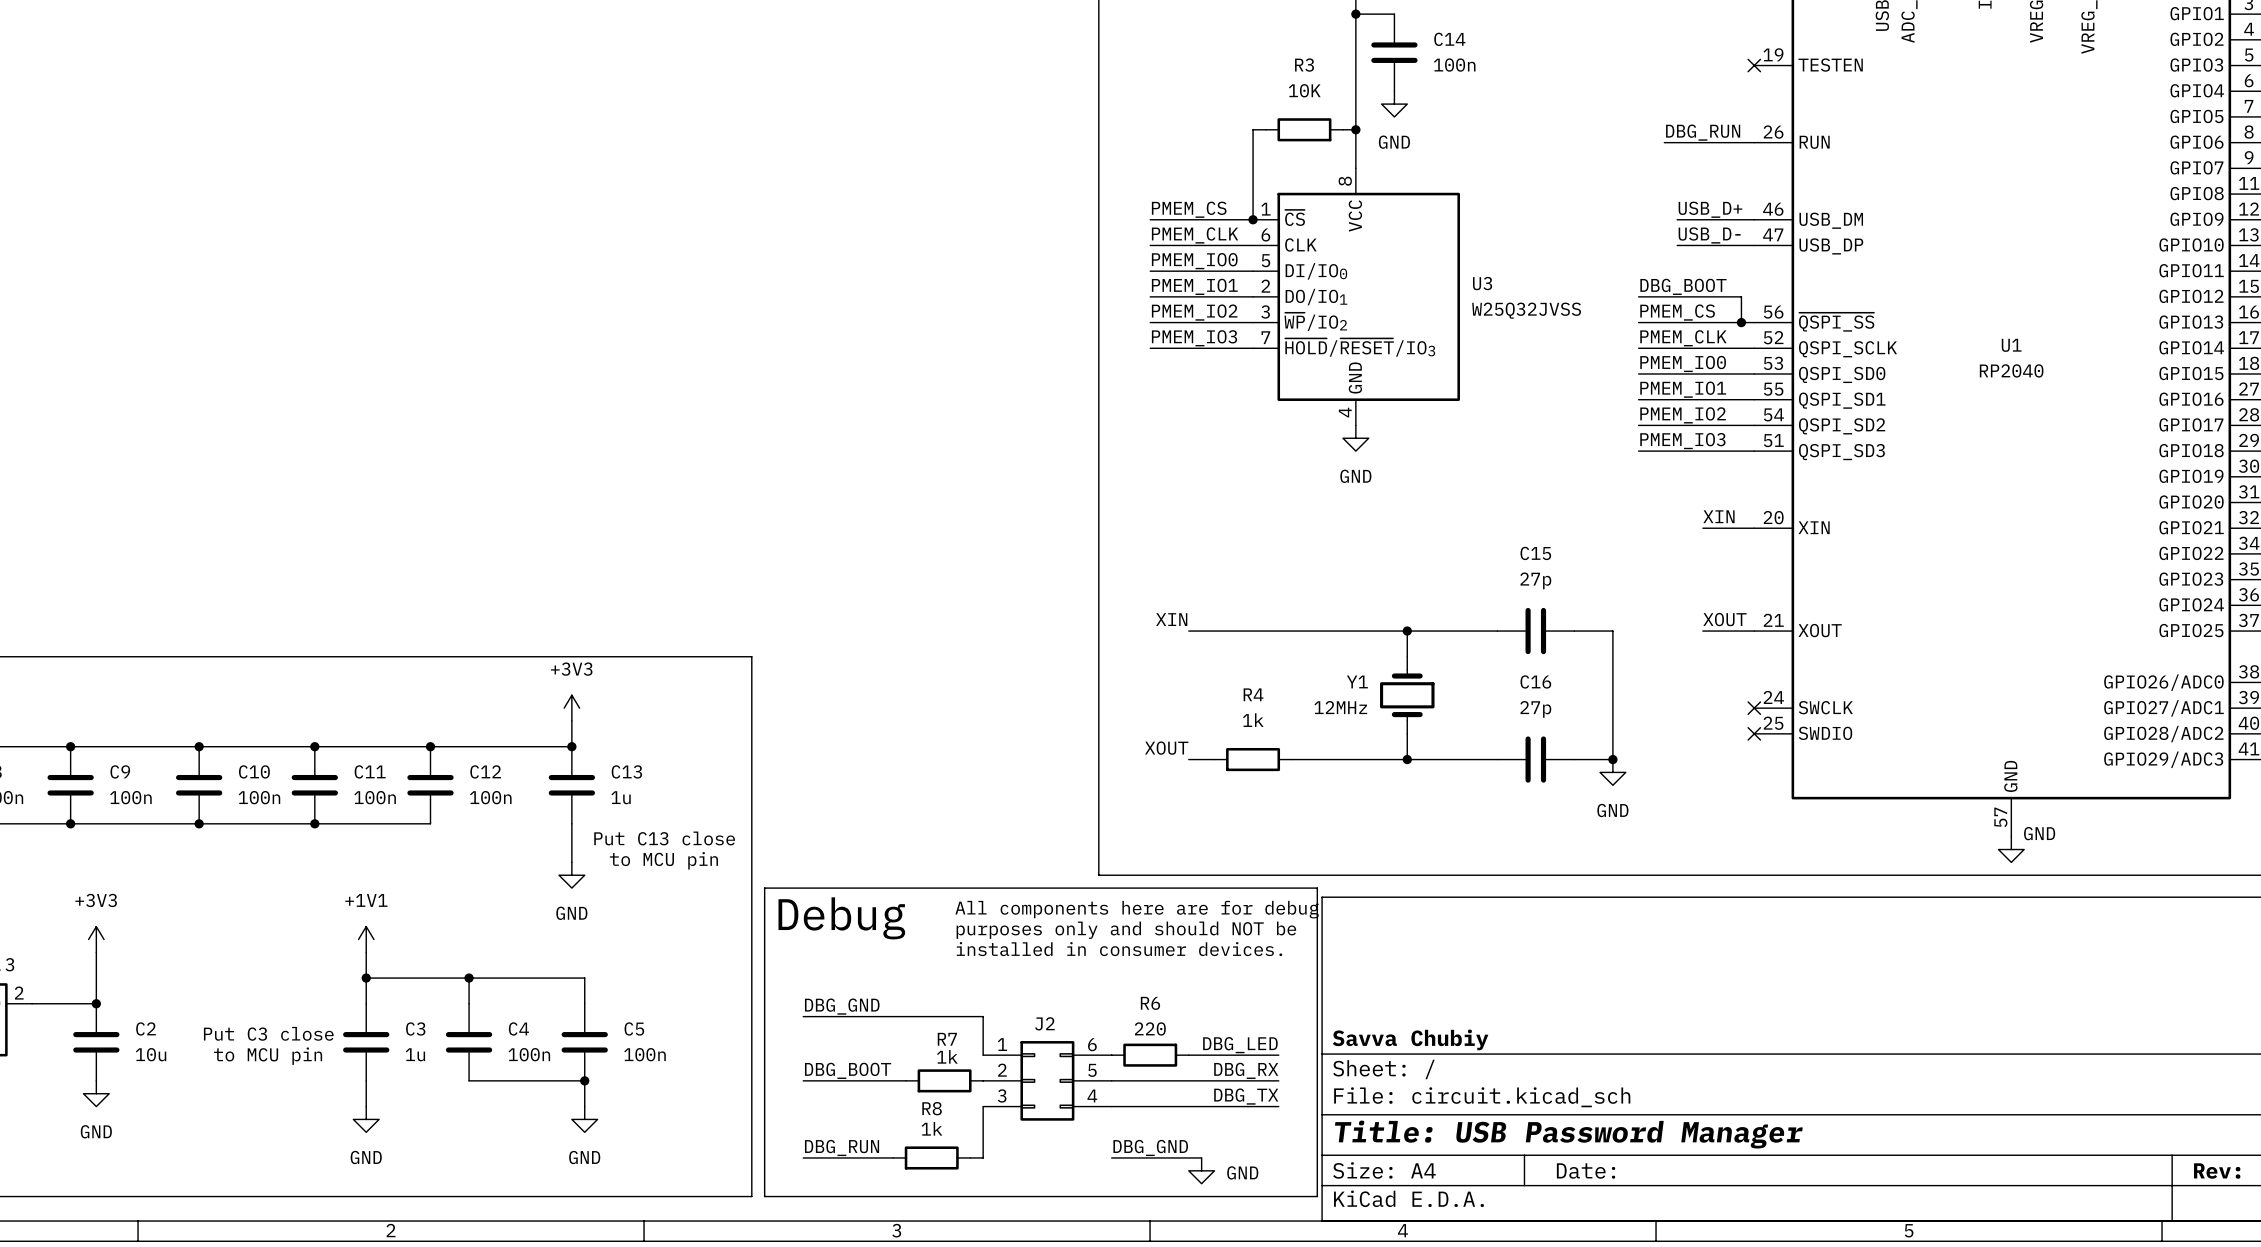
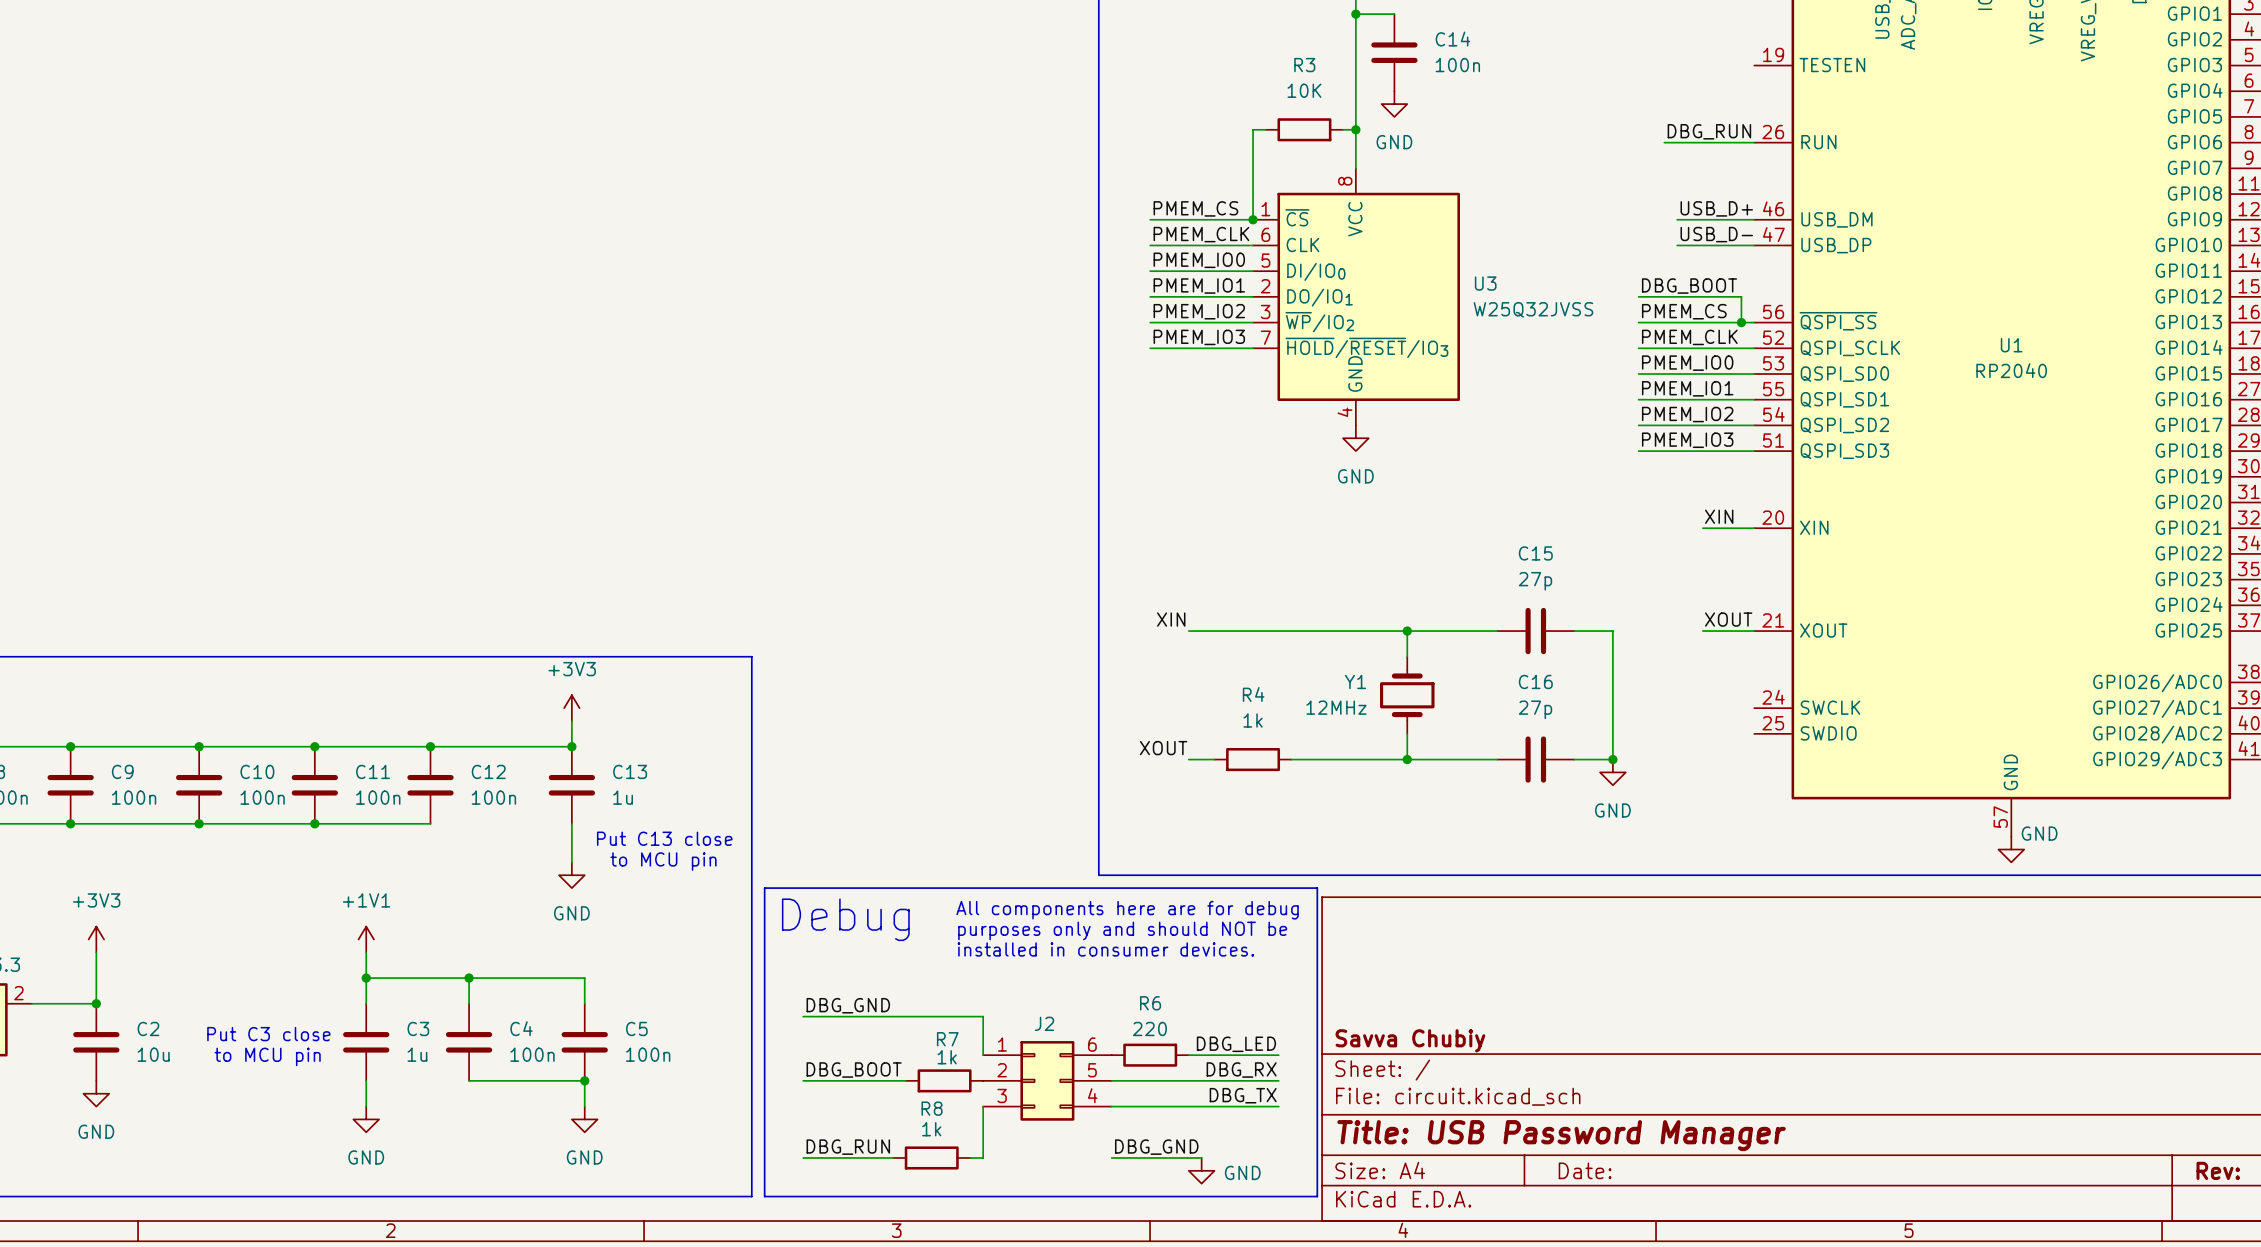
no-connect mark: (1754, 65) -> none
no-connect mark: (1754, 708) -> none
no-connect mark: (1754, 733) -> none

